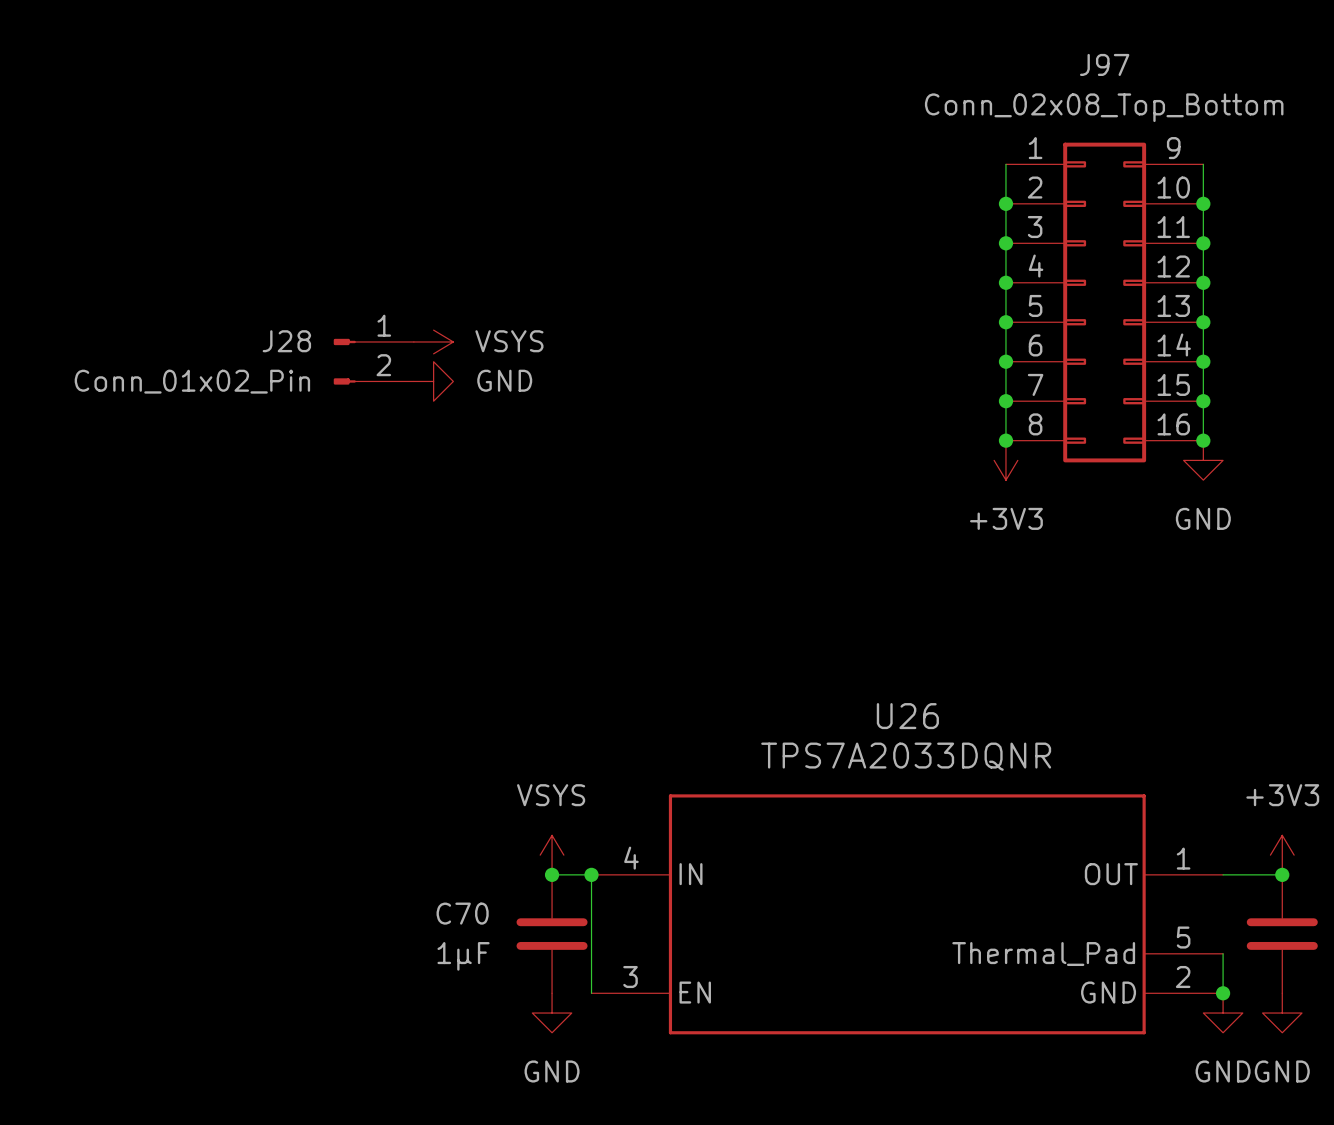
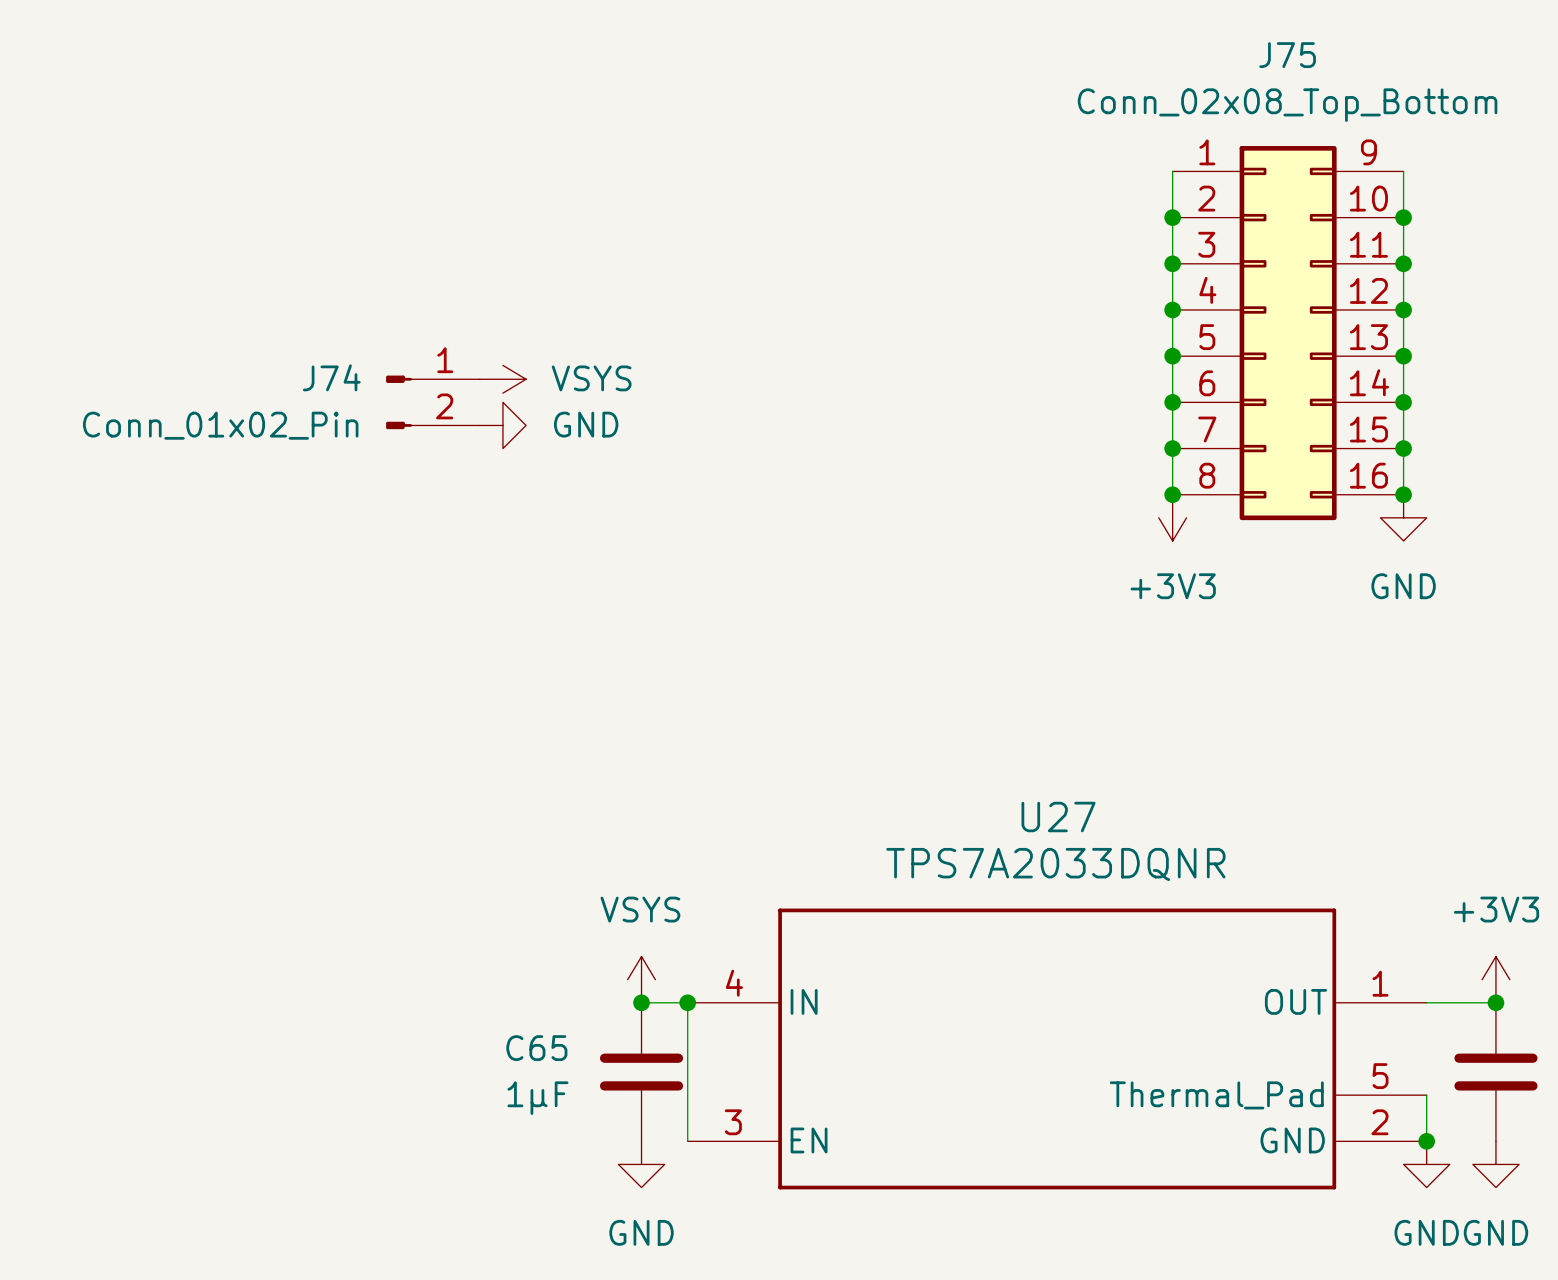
J97 name: J97 (1104, 64) -> J75 (1287, 55)
J28 name: J28 (286, 341) -> J74 (331, 377)
U26 name: U26 (907, 716) -> U27 (1058, 817)
C70 name: C70 (462, 913) -> C65 (536, 1048)

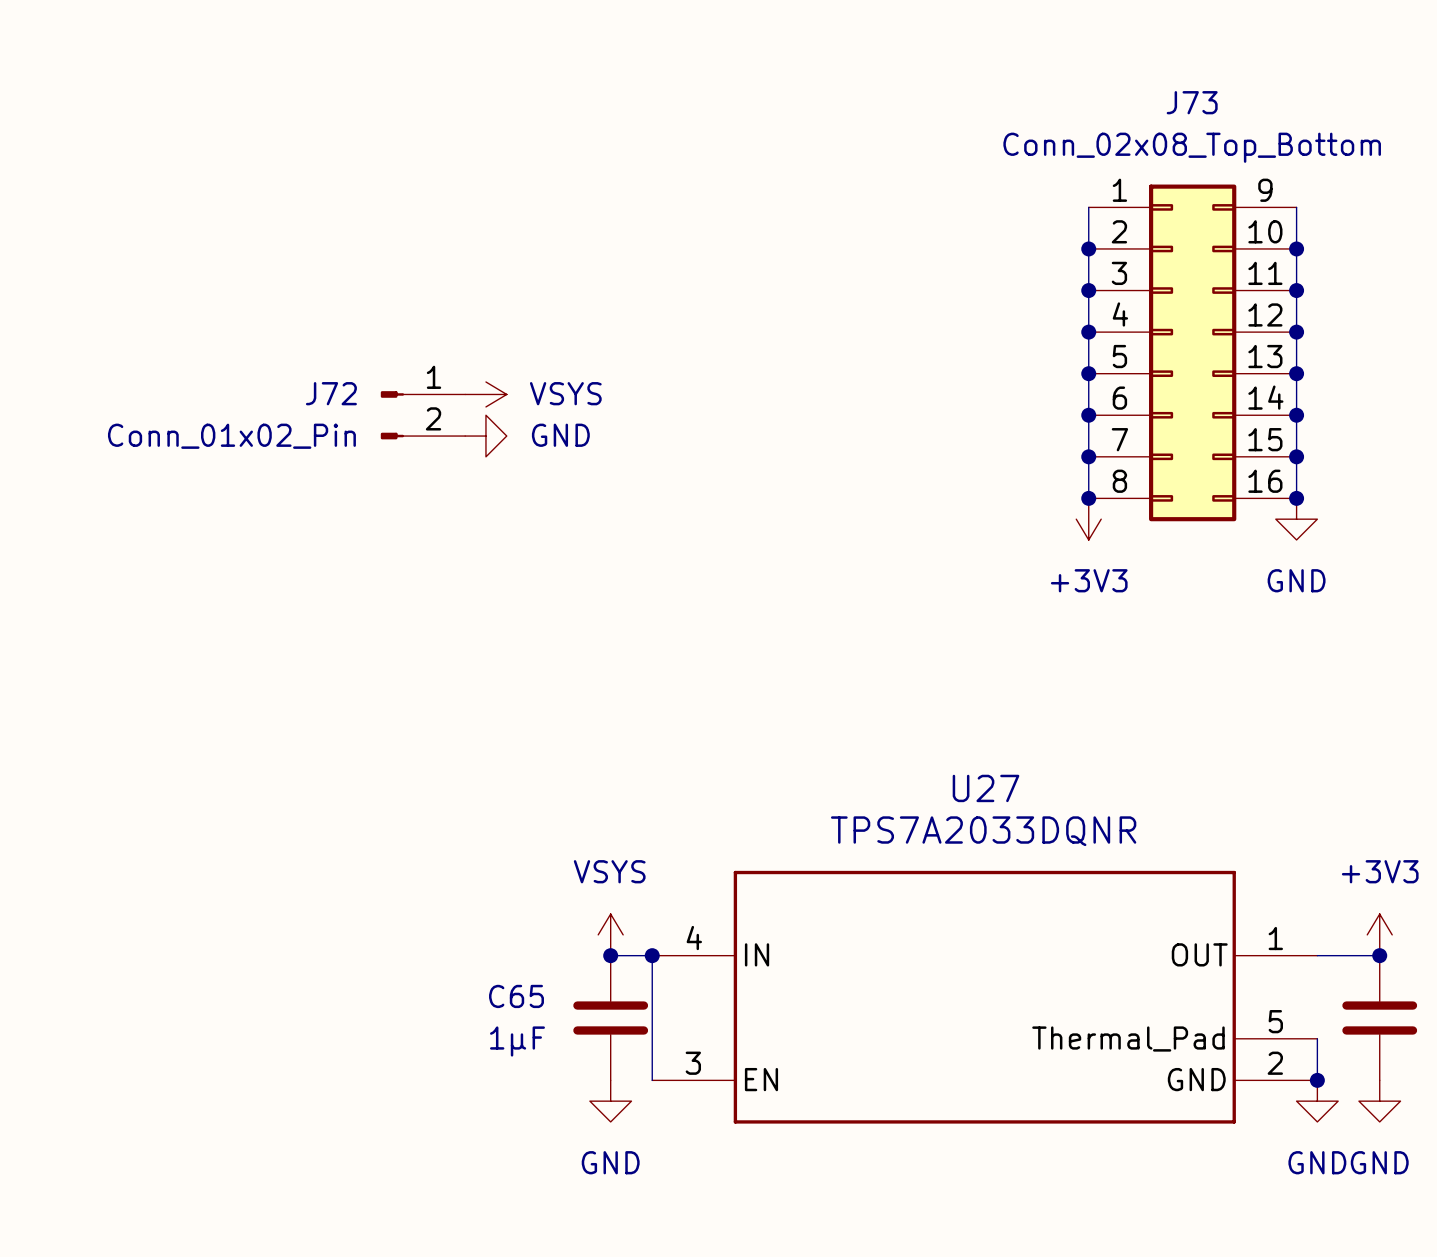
J75 name: J75 (1287, 55) -> J73 (1192, 102)
J74 name: J74 (331, 377) -> J72 (331, 393)

